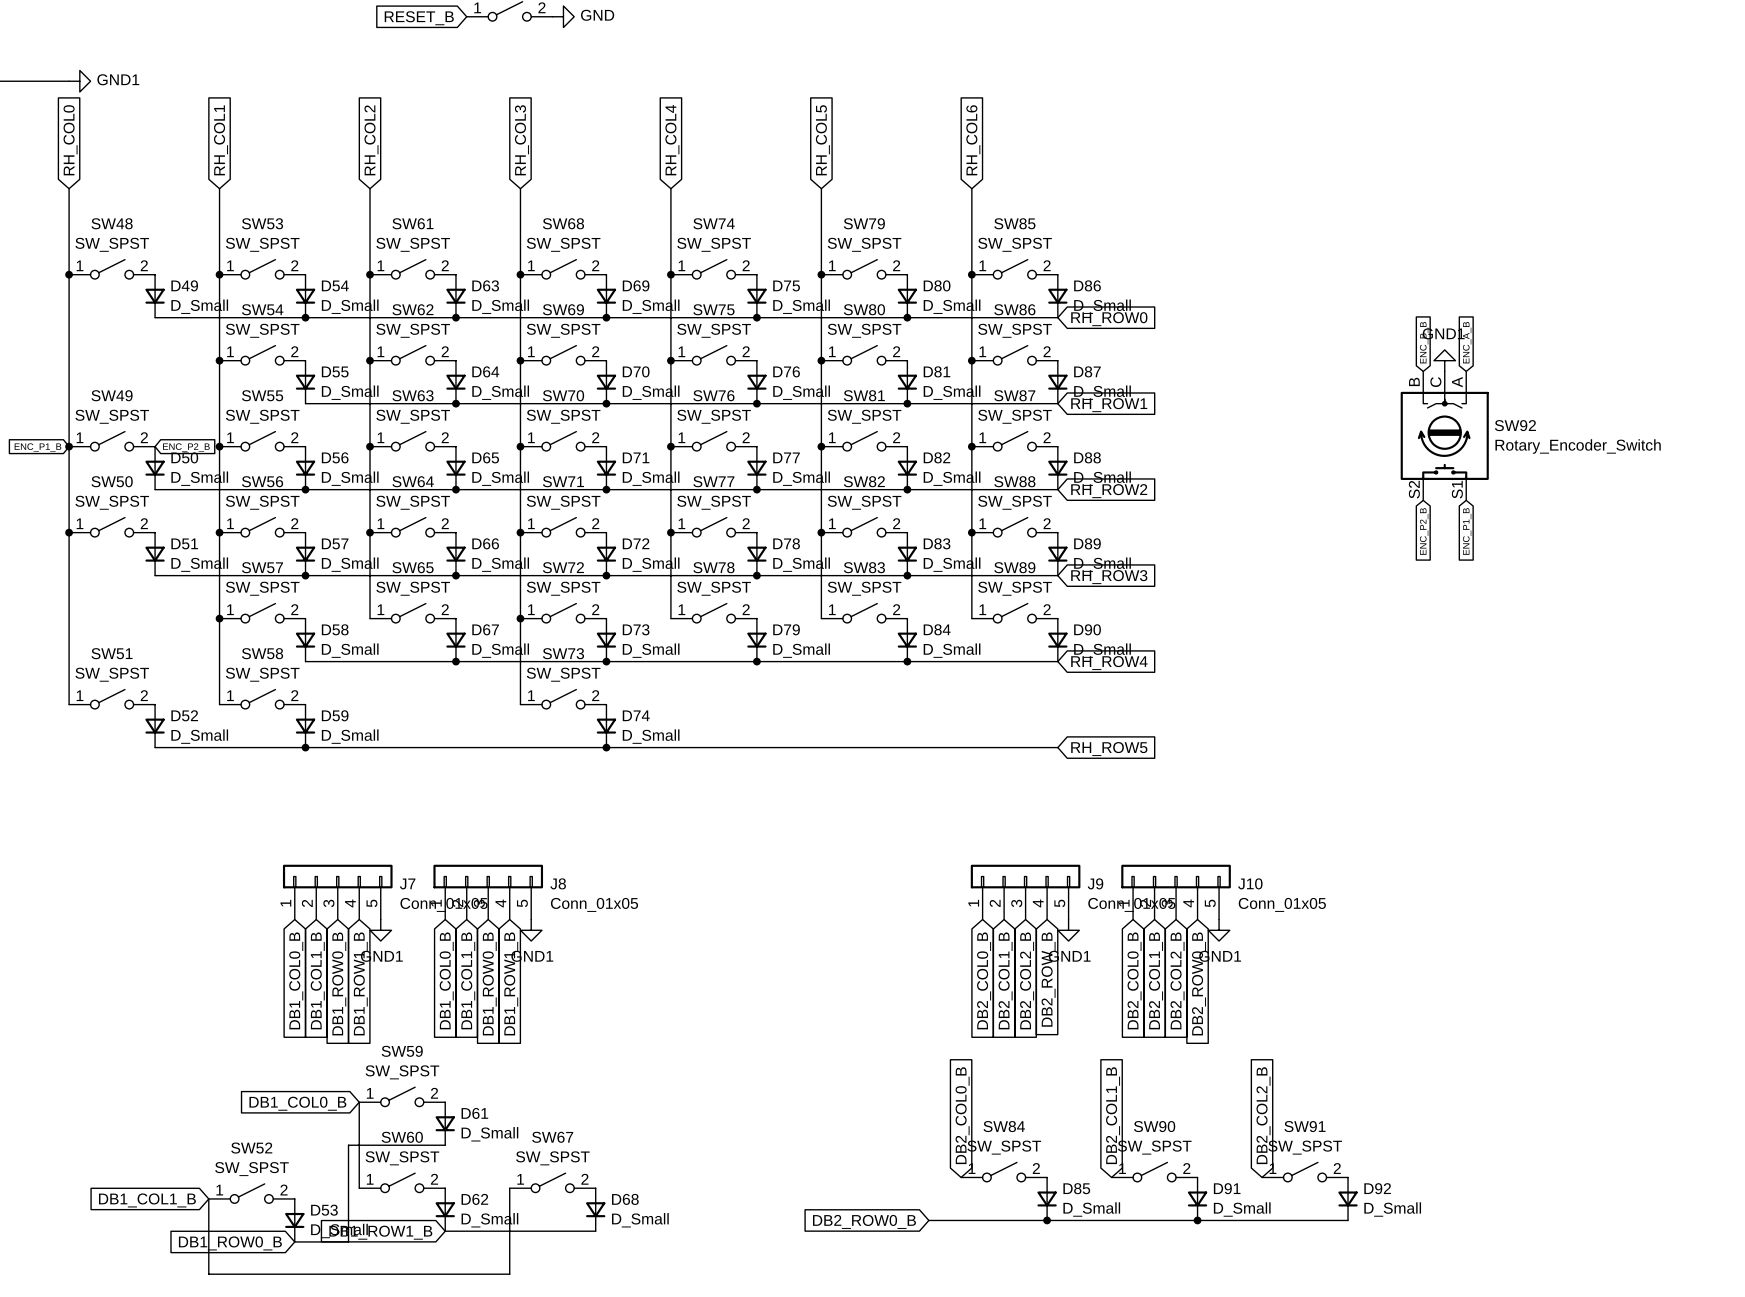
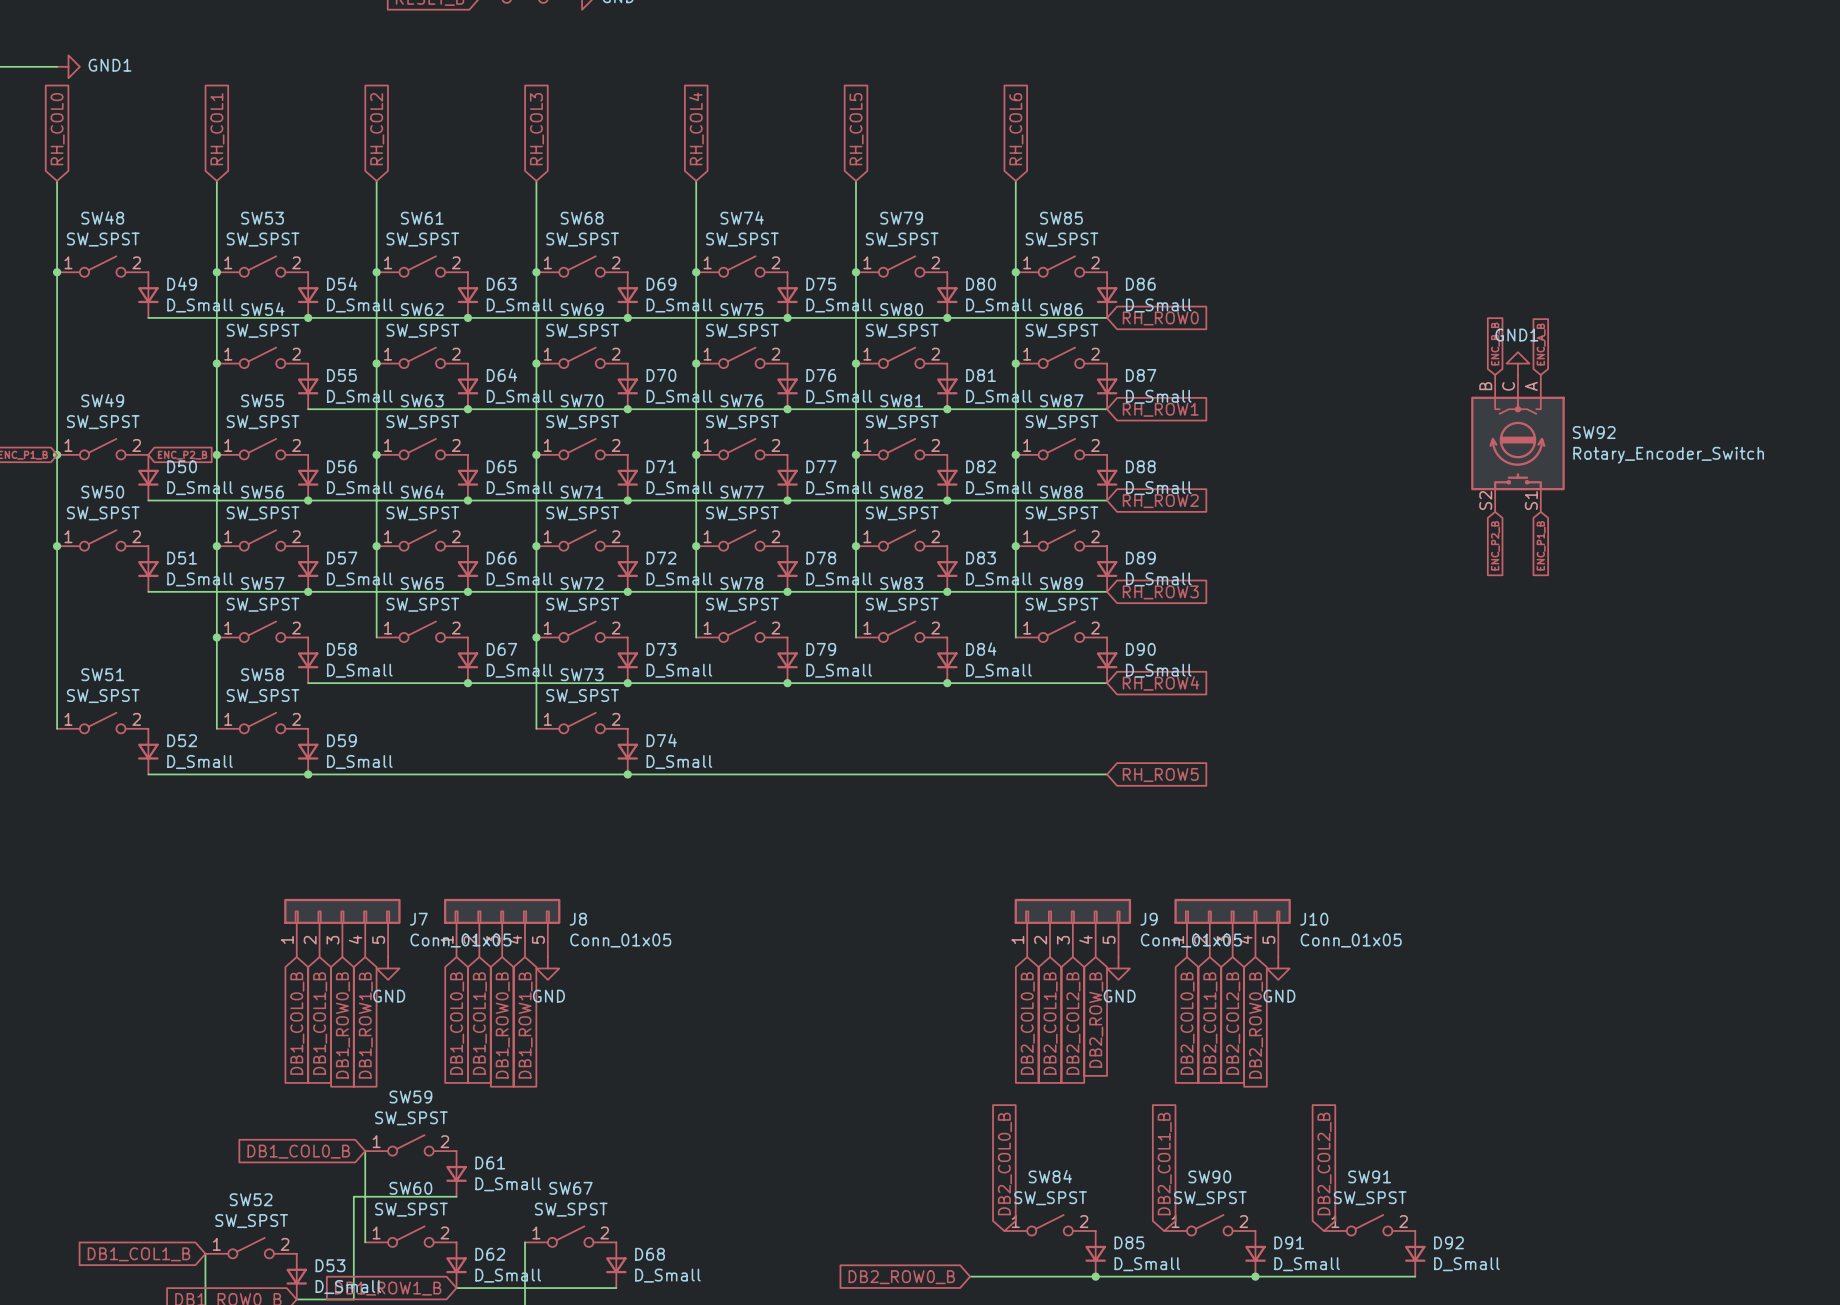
power symbol: GND1 (380, 930) -> GND (388, 968)
power symbol: GND1 (531, 930) -> GND (547, 968)
power symbol: GND1 (1068, 930) -> GND (1118, 968)
power symbol: GND1 (1219, 930) -> GND (1278, 968)

